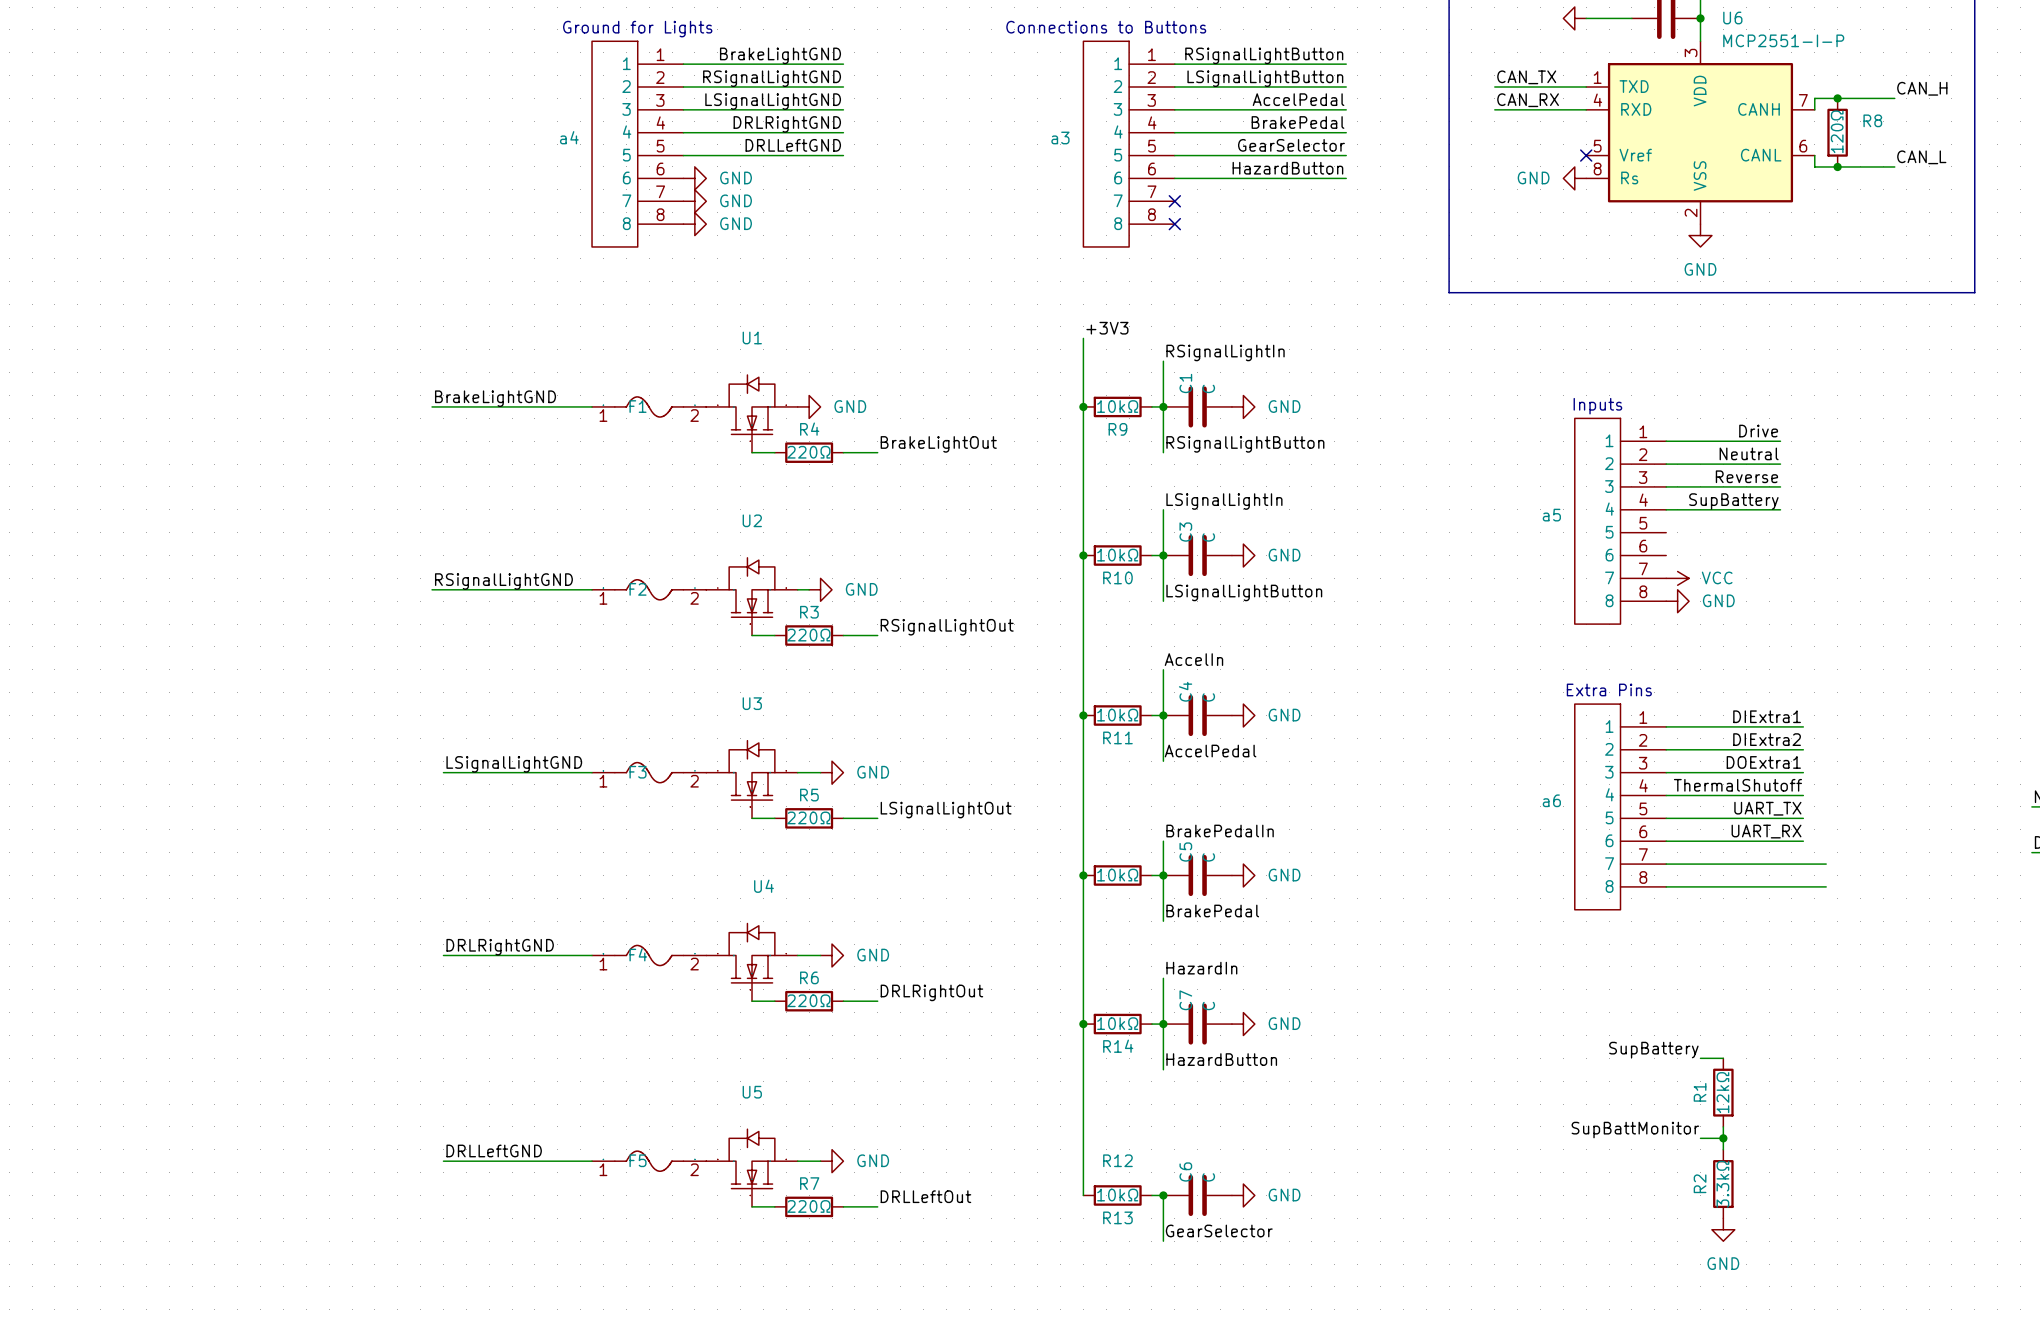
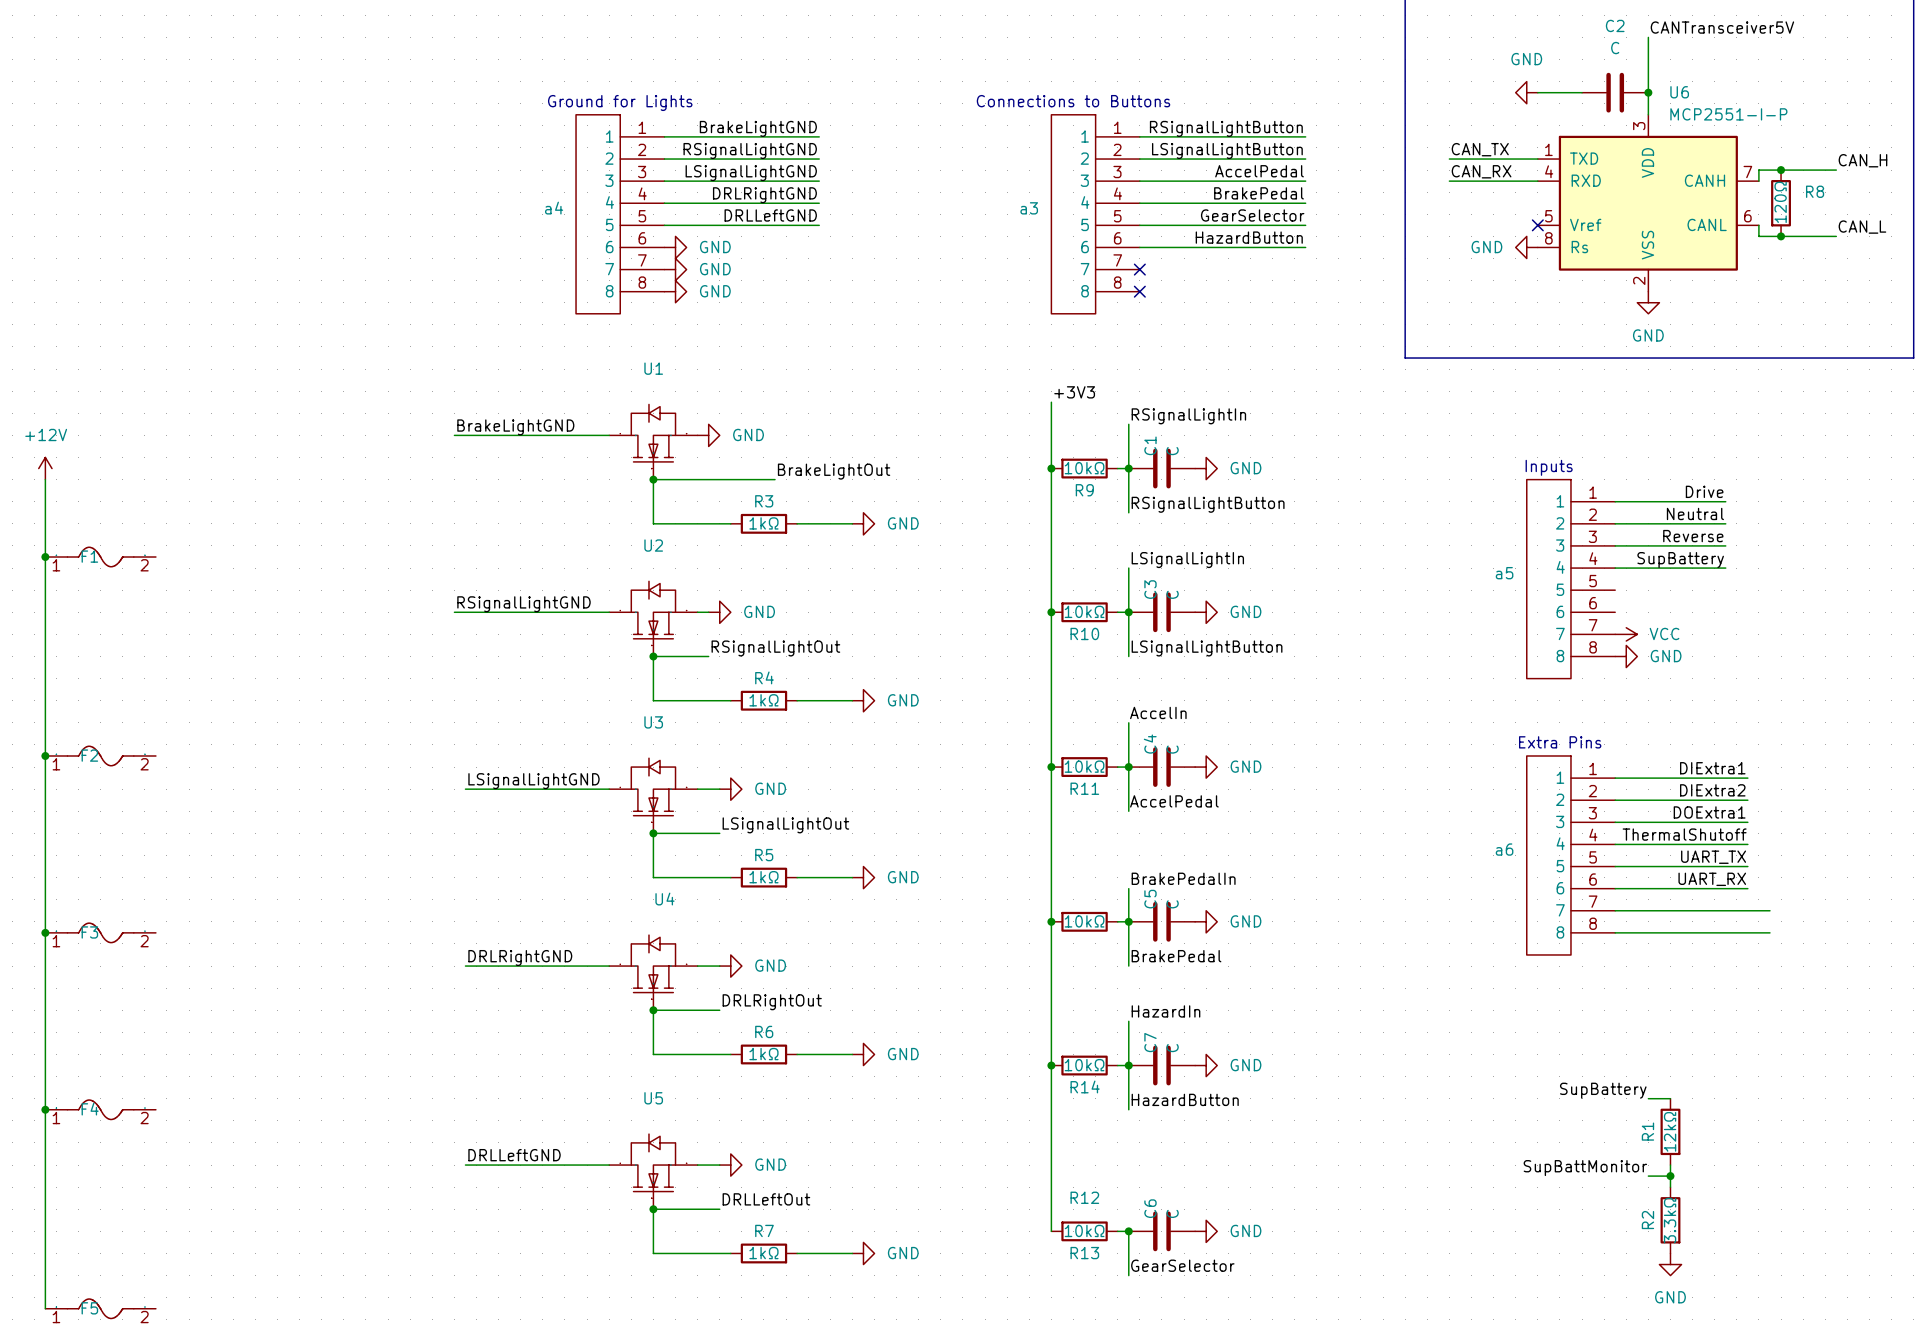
power symbol: none -> GND (708, 435)
label position: BrakeLightGND (495, 398) -> BrakeLightGND (515, 427)
power symbol: none -> +12V (45, 468)
wire: (432, 406) (592, 406) -> (454, 435) (609, 435)
F1 position: (649, 406) -> (100, 557)
power symbol: GND (809, 406) -> none
U1 position: (752, 413) -> (653, 442)
wire: none -> (45, 479) (45, 1308)
junction: none -> (653, 479)
wire: none -> (775, 479) (653, 479) (653, 523) (730, 523)
label position: BrakeLightOut (938, 444) -> BrakeLightOut (834, 471)
wire: (752, 452) (774, 452) -> none
R4 value: 220Ω (808, 452) -> 1kΩ (763, 700)
R4 position: (809, 452) -> (763, 700)
wire: (843, 452) (877, 452) -> none
wire: none -> (797, 523) (852, 523)
power symbol: none -> GND (863, 523)
junction: none -> (45, 557)
power symbol: none -> GND (719, 612)
label position: RSignalLightGND (503, 581) -> RSignalLightGND (523, 604)
wire: (432, 589) (592, 589) -> (454, 612) (609, 612)
F2 position: (649, 589) -> (100, 755)
wire: (797, 589) (809, 589) -> (697, 612) (708, 612)
power symbol: GND (820, 589) -> none
U2 position: (752, 596) -> (653, 618)
junction: none -> (653, 656)
wire: none -> (708, 656) (653, 656) (653, 700) (730, 700)
label position: RSignalLightOut (947, 627) -> RSignalLightOut (775, 648)
wire: (752, 635) (774, 635) -> none
R3 value: 220Ω (808, 635) -> 1kΩ (763, 523)
R3 position: (809, 635) -> (763, 523)
wire: (843, 635) (877, 635) -> none
wire: none -> (797, 700) (852, 700)
power symbol: none -> GND (863, 700)
junction: none -> (45, 755)
power symbol: none -> GND (730, 789)
label position: LSignalLightGND (514, 764) -> LSignalLightGND (533, 781)
wire: (443, 772) (592, 772) -> (465, 789) (609, 789)
F3 position: (649, 772) -> (100, 932)
wire: (797, 772) (820, 772) -> (697, 789) (719, 789)
power symbol: GND (832, 772) -> none
U3 position: (752, 779) -> (653, 795)
junction: none -> (653, 833)
wire: none -> (719, 833) (653, 833) (653, 877) (730, 877)
label position: LSignalLightOut (946, 810) -> LSignalLightOut (785, 825)
R5 value: 220Ω (808, 817) -> 1kΩ (763, 877)
wire: (752, 818) (774, 818) -> none
R5 position: (809, 818) -> (763, 877)
wire: (843, 818) (877, 818) -> none
wire: none -> (797, 877) (852, 877)
power symbol: none -> GND (863, 877)
junction: none -> (45, 932)
power symbol: none -> GND (730, 966)
label position: DRLRightGND (500, 947) -> DRLRightGND (520, 958)
wire: (443, 955) (592, 955) -> (465, 966) (609, 966)
F4 position: (649, 955) -> (100, 1109)
wire: (797, 955) (820, 955) -> (697, 966) (719, 966)
power symbol: GND (832, 955) -> none
U4 position: (752, 962) -> (653, 972)
junction: none -> (653, 1010)
wire: none -> (719, 1010) (653, 1010) (653, 1054) (730, 1054)
label position: DRLRightOut (931, 992) -> DRLRightOut (772, 1002)
R6 value: 220Ω (808, 1000) -> 1kΩ (763, 1054)
wire: (752, 1001) (774, 1001) -> none
R6 position: (809, 1001) -> (763, 1054)
wire: (843, 1001) (877, 1001) -> none
wire: none -> (797, 1054) (852, 1054)
power symbol: none -> GND (863, 1054)
junction: none -> (45, 1109)
power symbol: none -> GND (730, 1165)
label position: DRLLeftGND (494, 1150) -> DRLLeftGND (514, 1155)
wire: (443, 1161) (592, 1161) -> (465, 1165) (609, 1165)
F5 position: (649, 1161) -> (100, 1308)
wire: (797, 1161) (820, 1161) -> (697, 1165) (719, 1165)
power symbol: GND (832, 1161) -> none
U5 position: (752, 1168) -> (653, 1171)
junction: none -> (653, 1209)
wire: none -> (719, 1209) (653, 1209) (653, 1253) (730, 1253)
label position: DRLLeftOut (925, 1196) -> DRLLeftOut (766, 1199)
wire: (752, 1206) (774, 1206) -> none
R7 value: 220Ω (808, 1206) -> 1kΩ (763, 1253)
R7 position: (809, 1206) -> (763, 1253)
wire: (843, 1206) (877, 1206) -> none
wire: none -> (797, 1253) (852, 1253)
power symbol: none -> GND (863, 1253)

